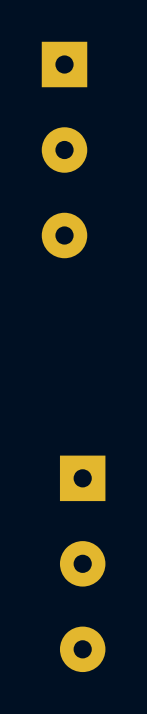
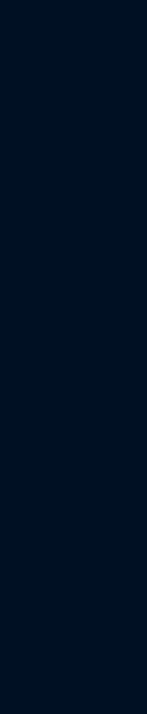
part: (64, 150) -> none
part: (82, 563) -> none

